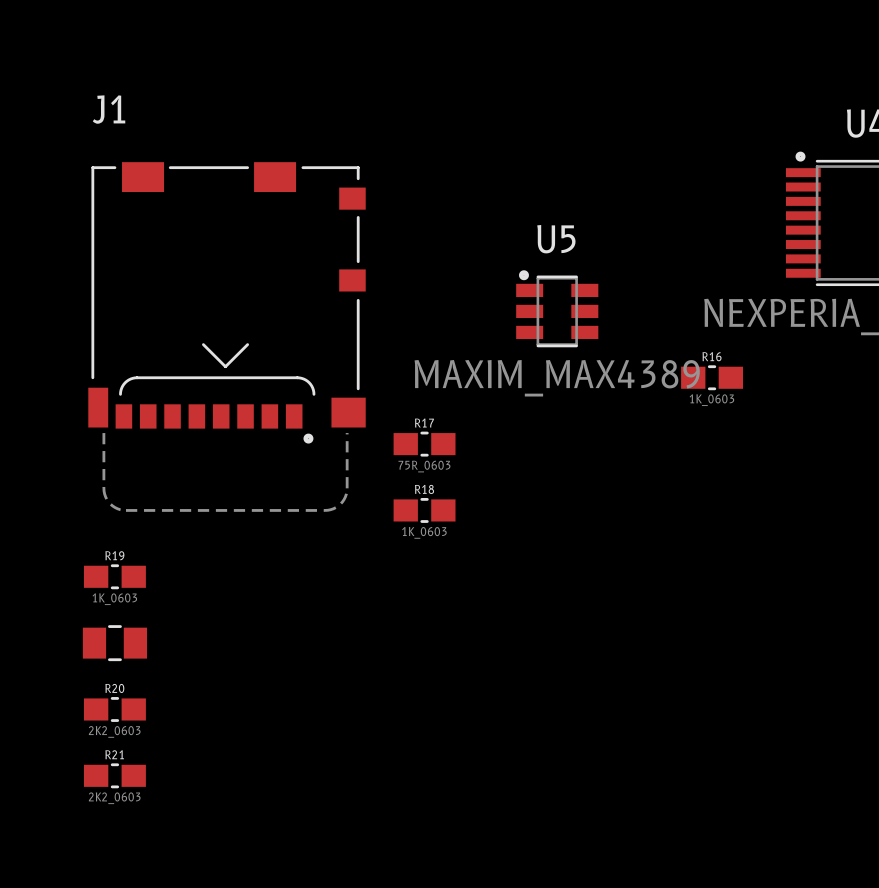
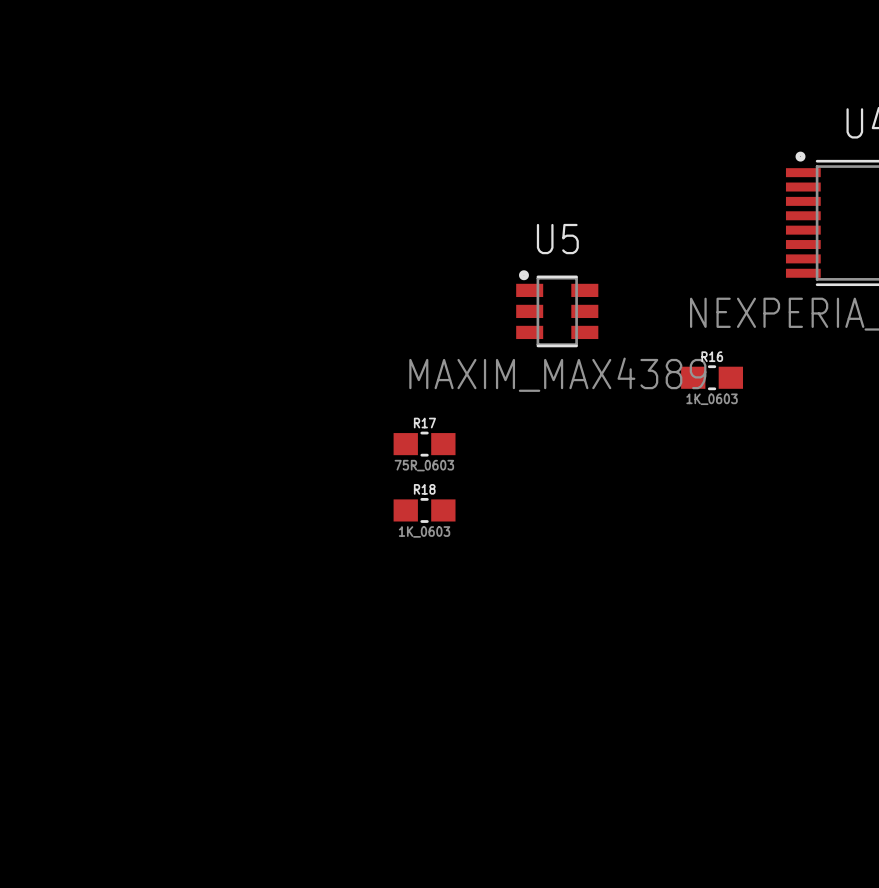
J1: (227, 336) -> none
R19: 1K_0603 (114, 576) -> none
part: (114, 643) -> none
R20: 2K2_0603 (114, 709) -> none
R21: 2K2_0603 (114, 775) -> none

